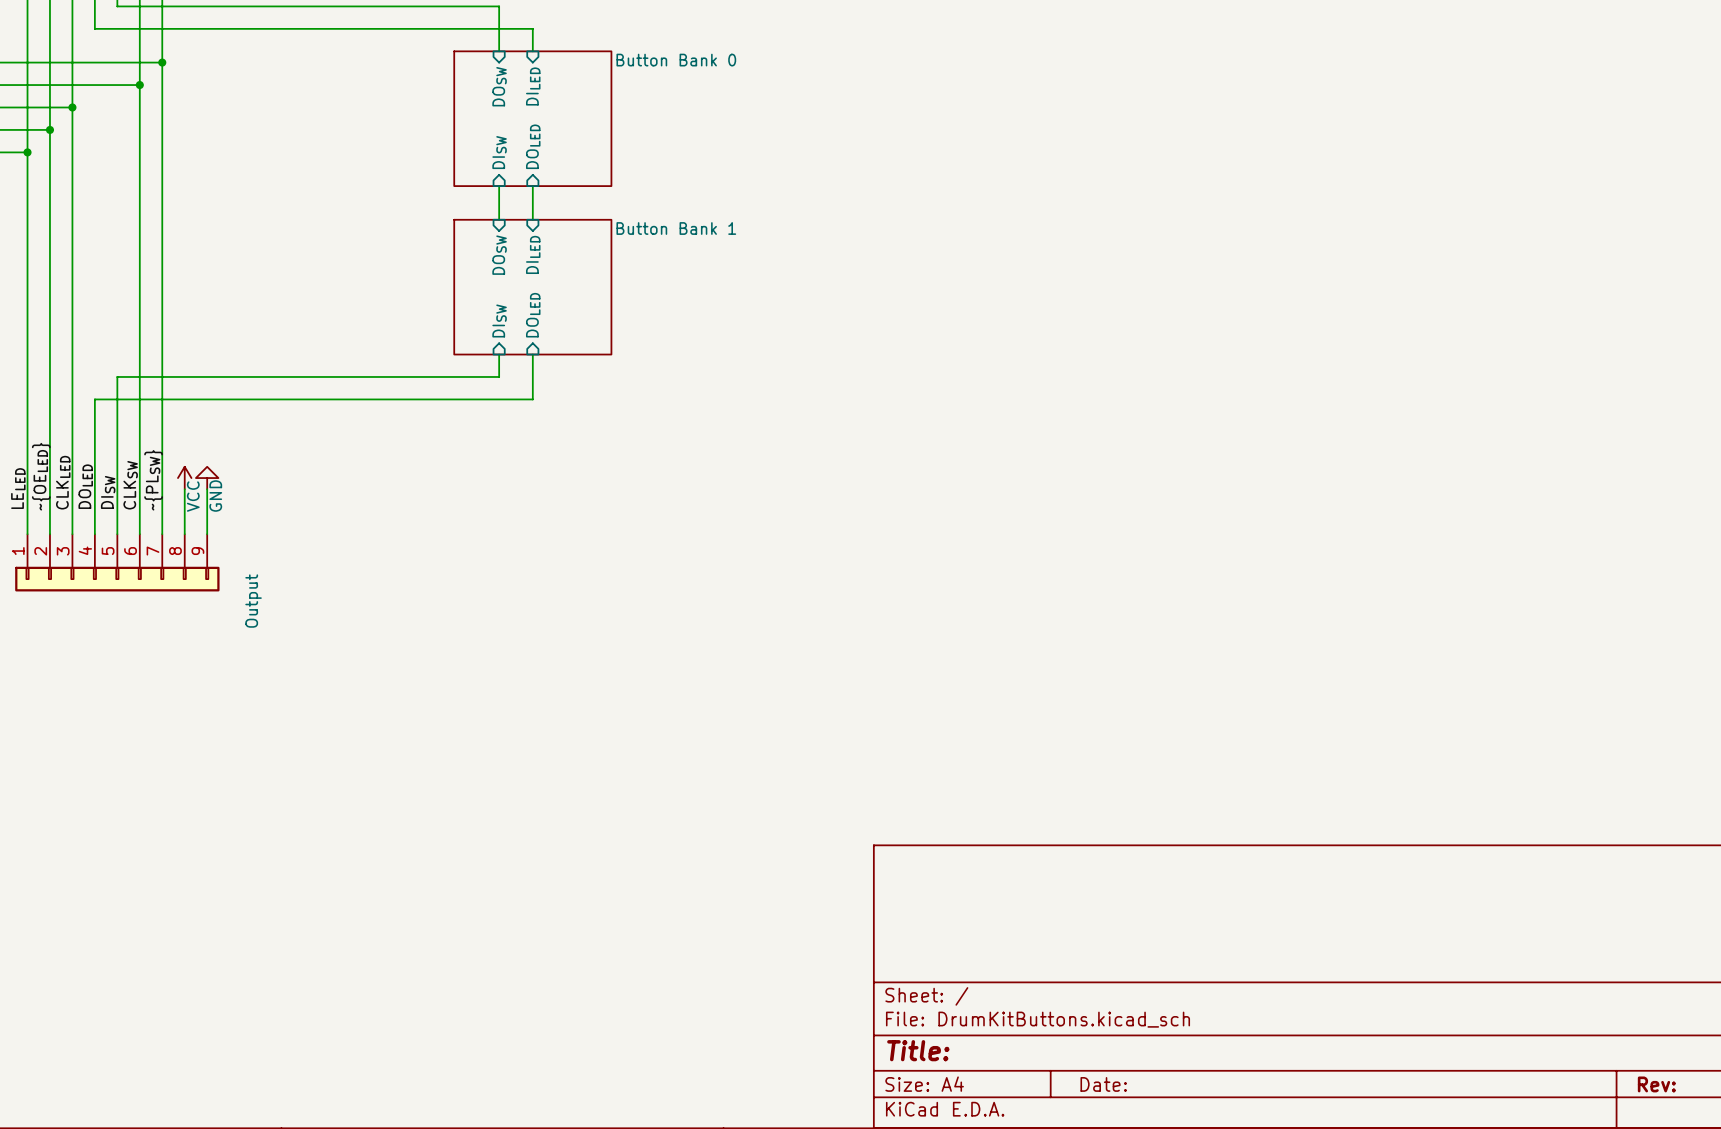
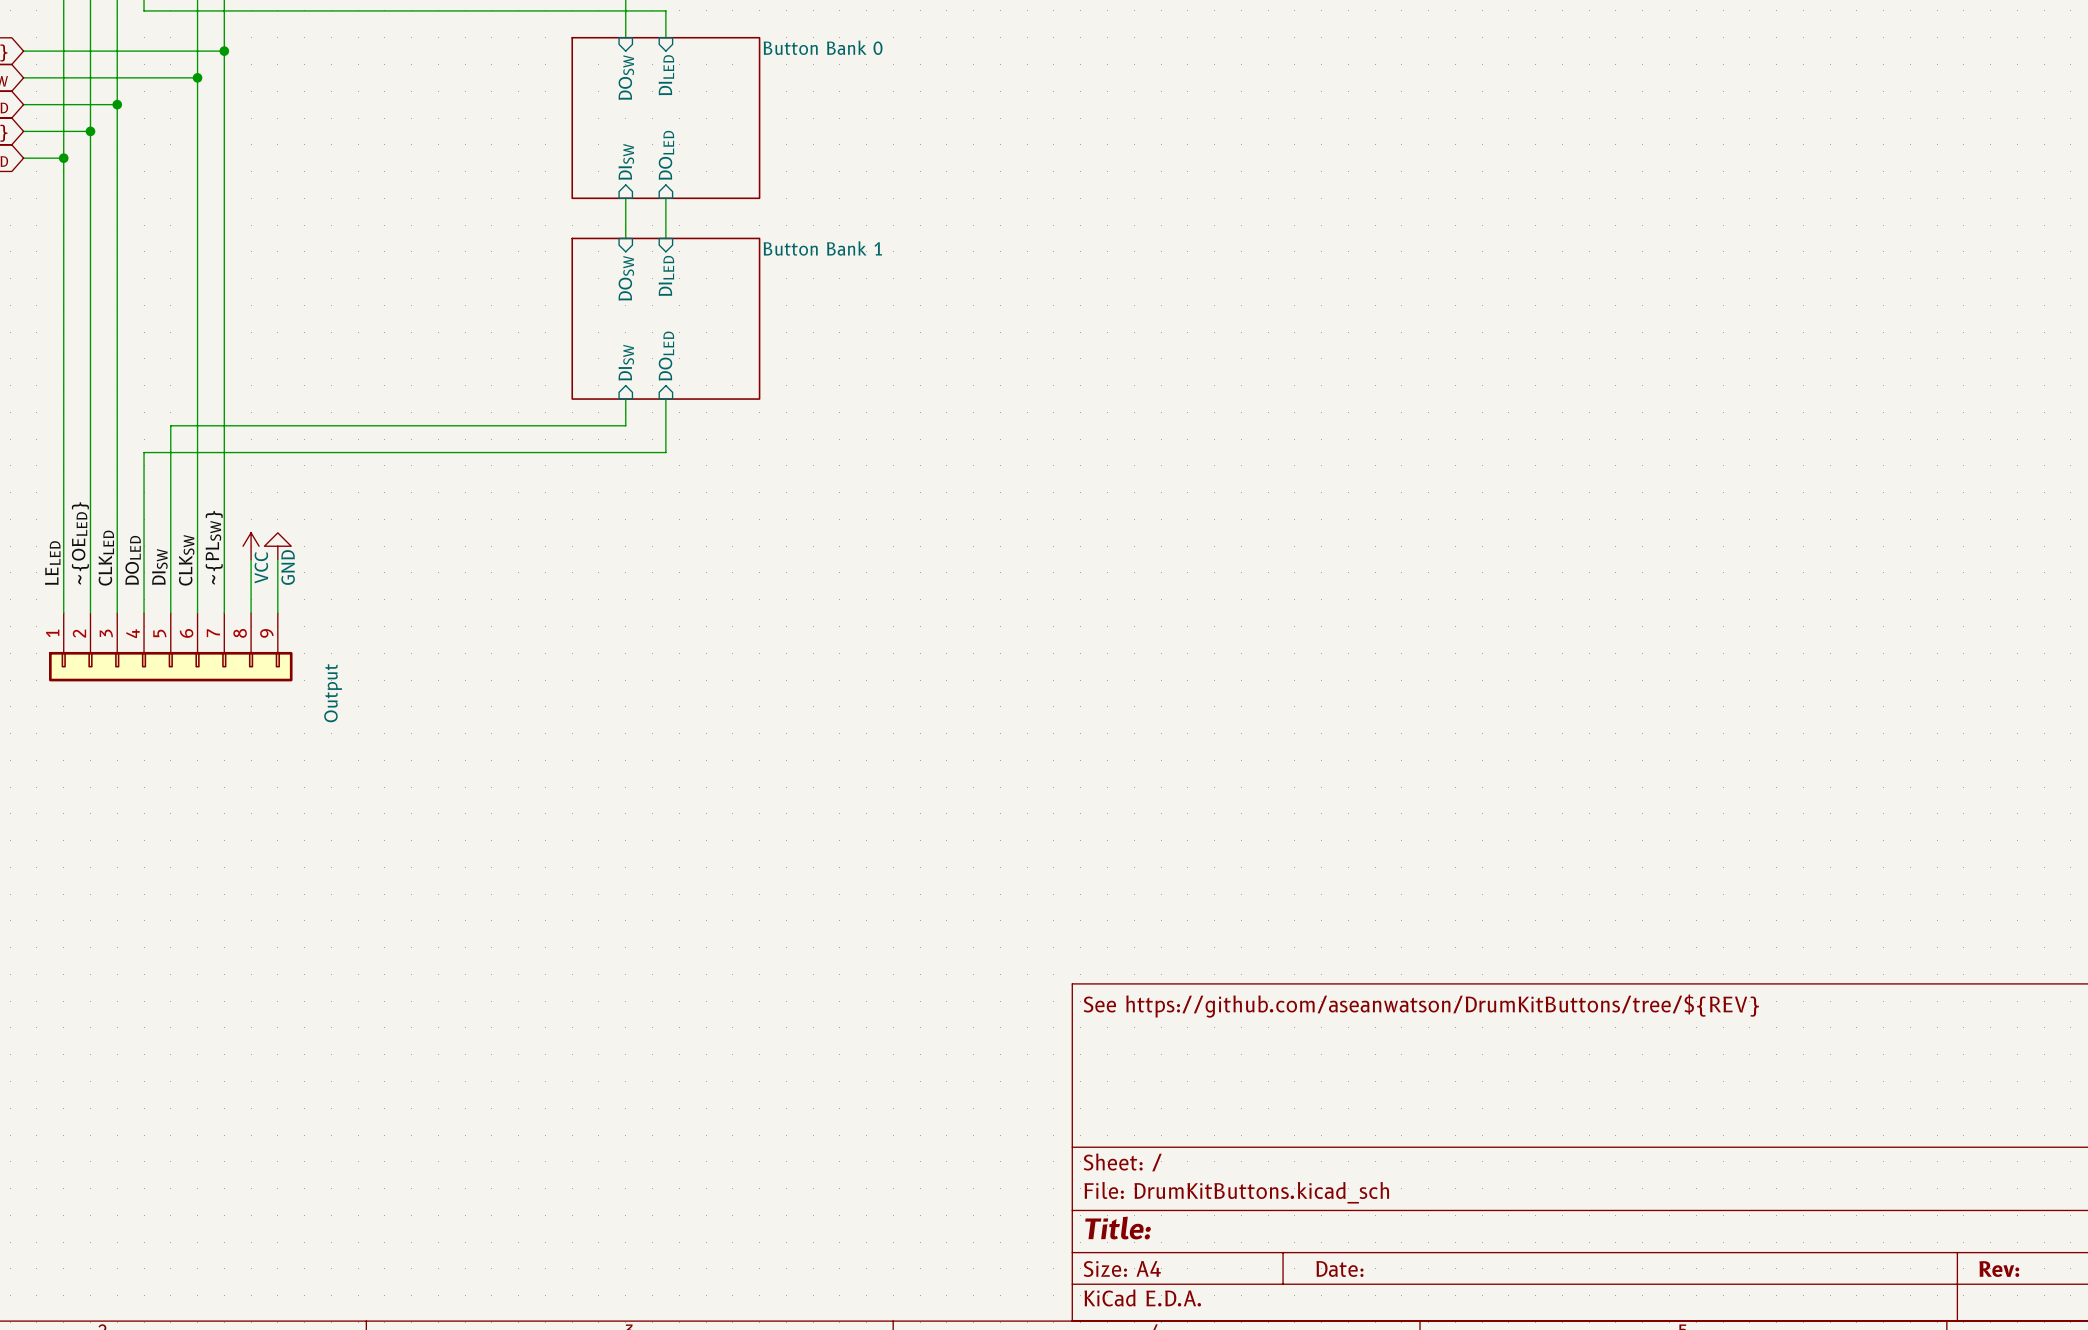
title block: none -> See https://github.com/aseanwatson/DrumKitButtons/tree/${REV} (1421, 1006)

